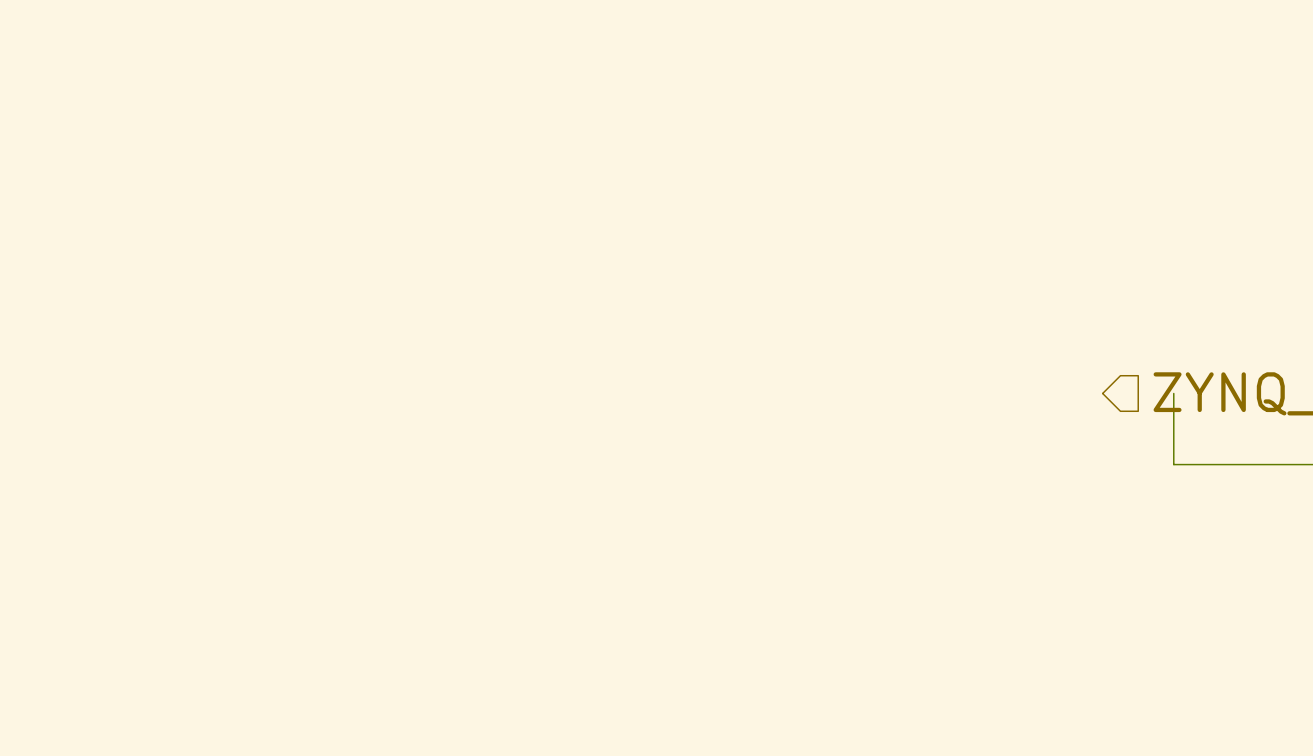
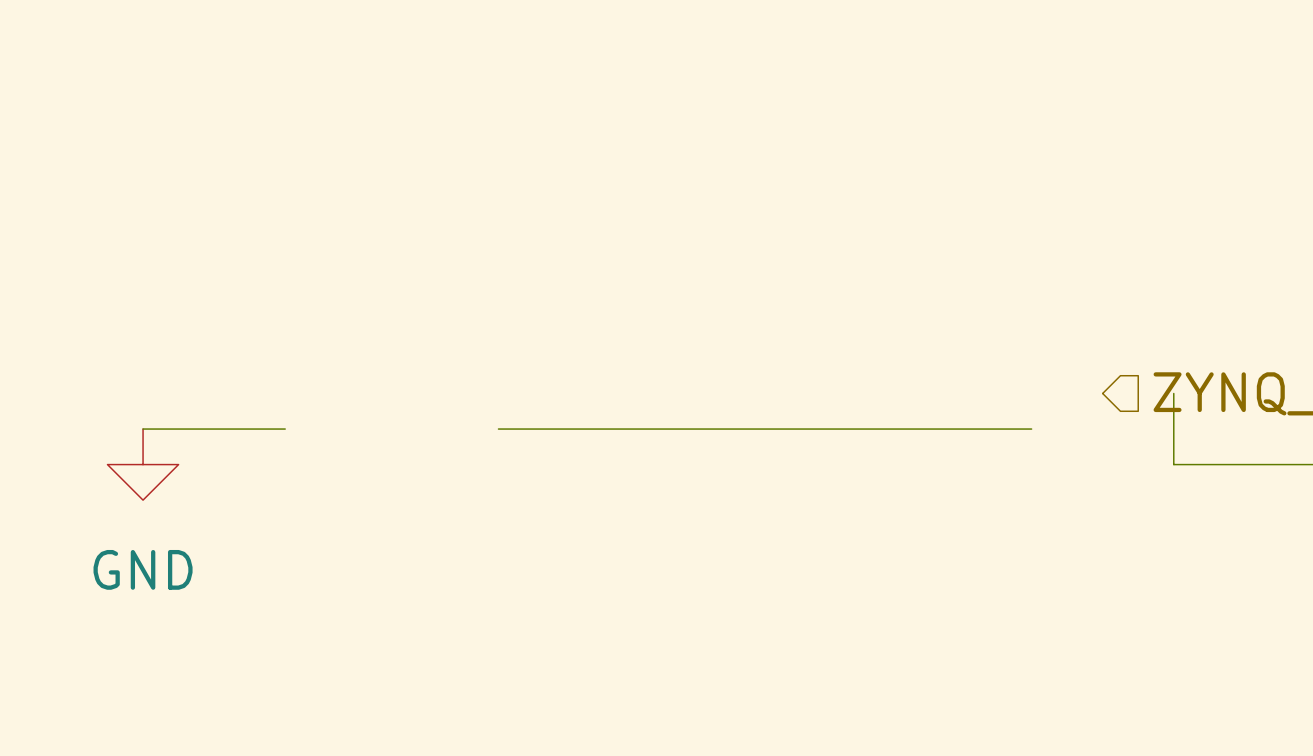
wire: none -> (143, 429) (285, 429)
wire: none -> (498, 429) (1031, 429)
power symbol: none -> GND (143, 464)

